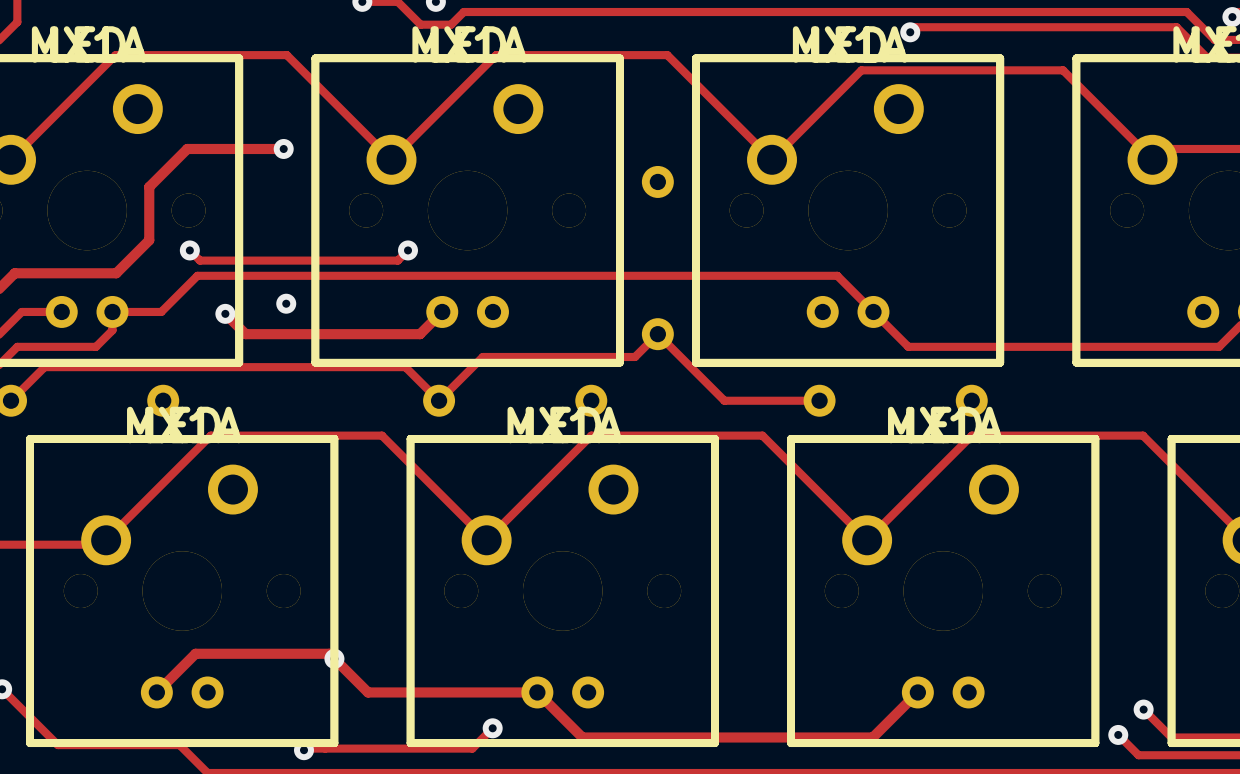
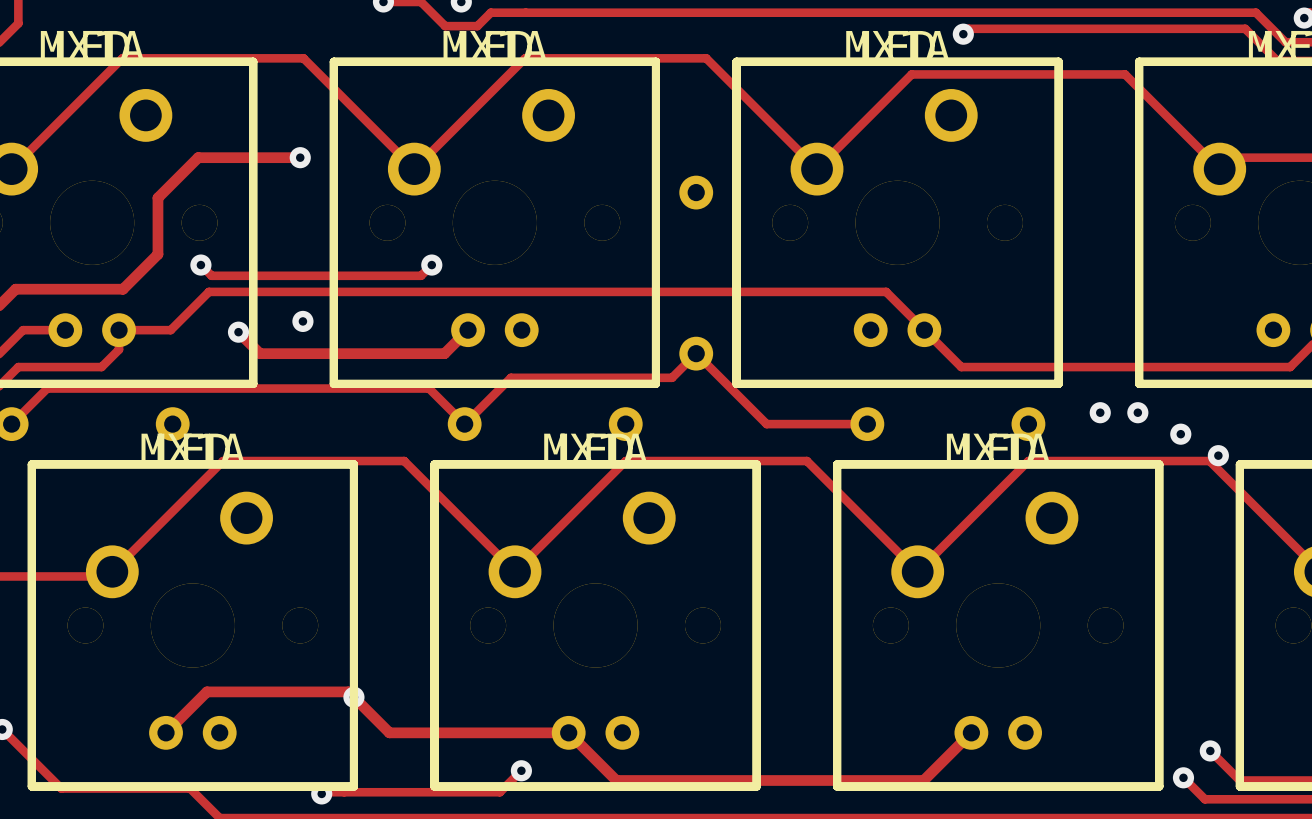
via: none -> (1100, 412)
via: none -> (1137, 412)
via: none -> (1180, 434)
via: none -> (1218, 455)

